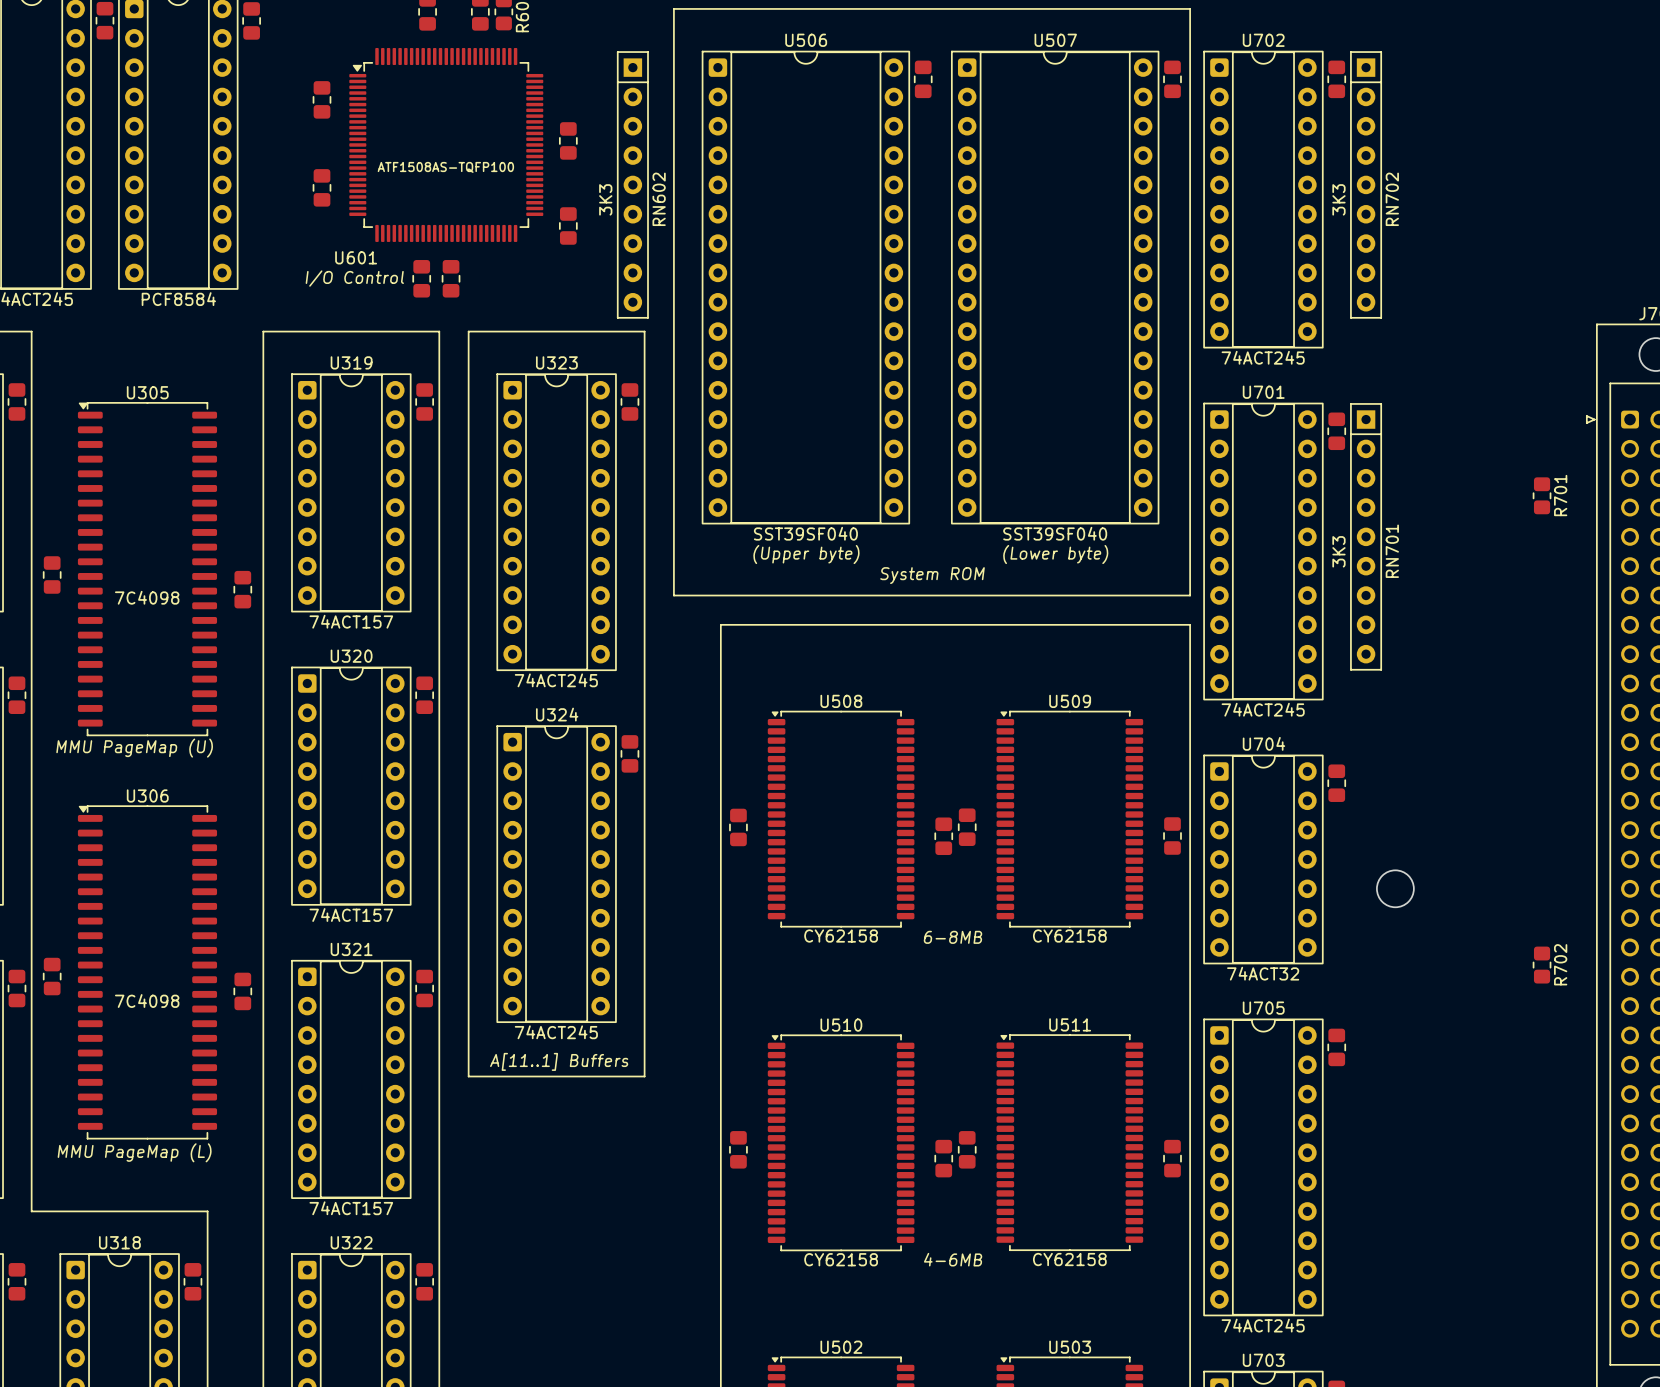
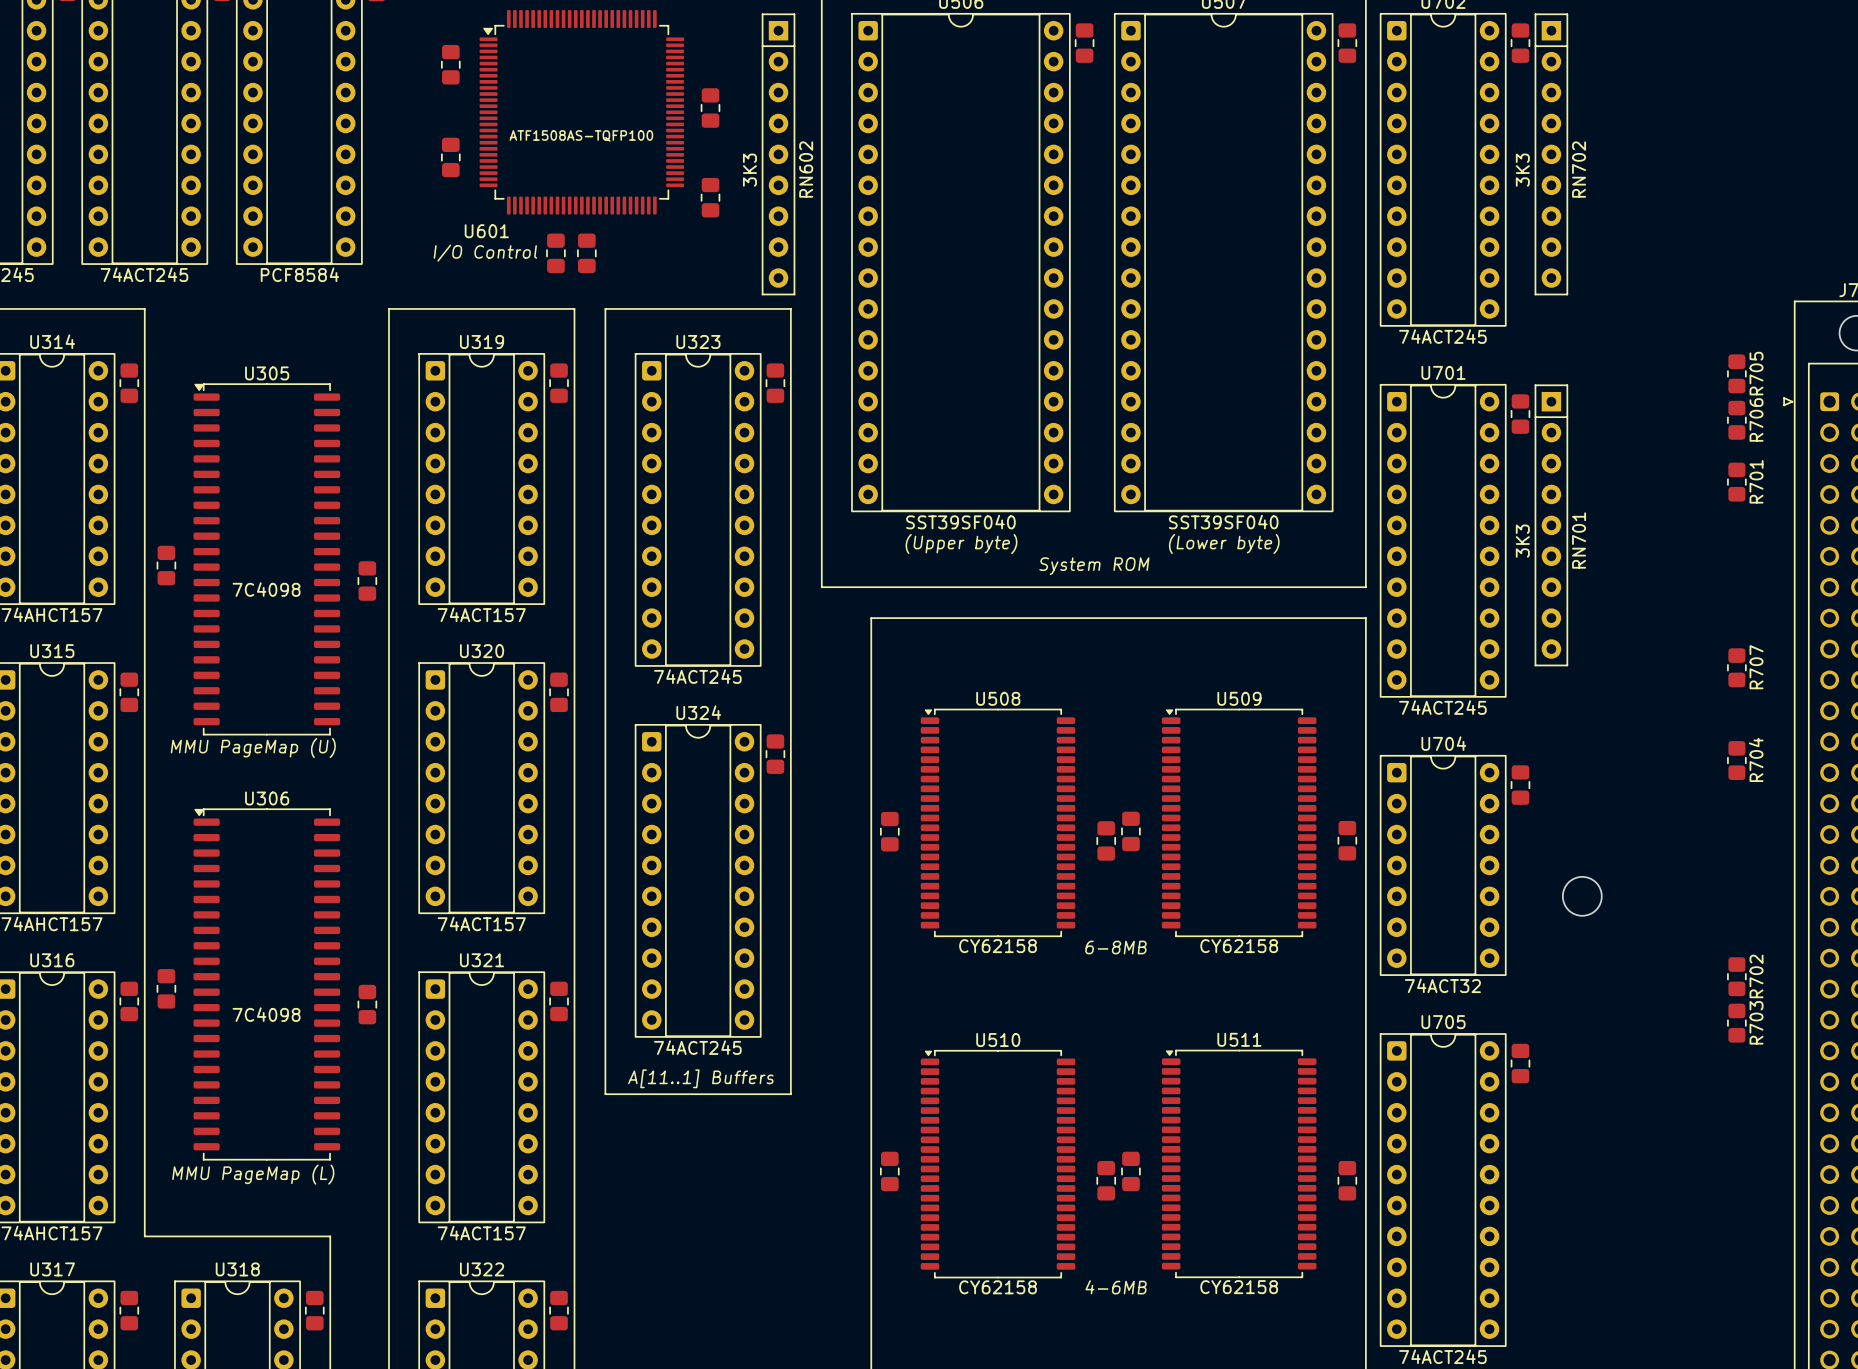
R705: none -> (1736, 373)
R706: none -> (1736, 420)
R707: none -> (1736, 667)
R704: none -> (1736, 760)
R703: none -> (1736, 1023)

